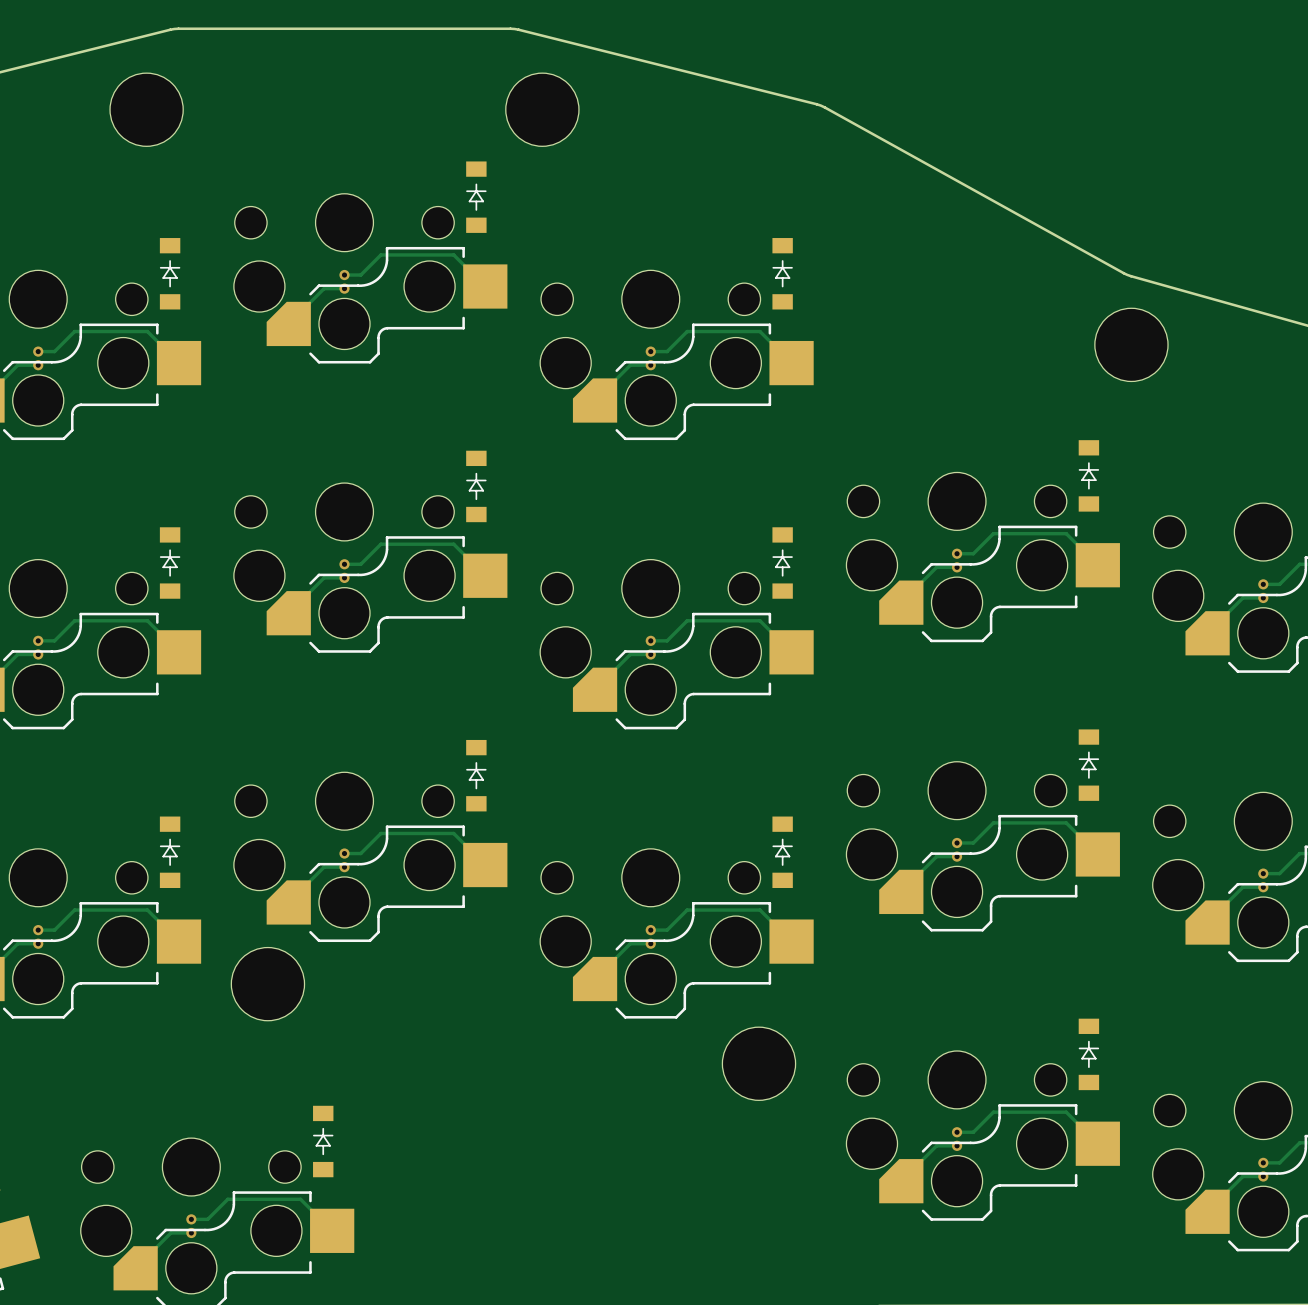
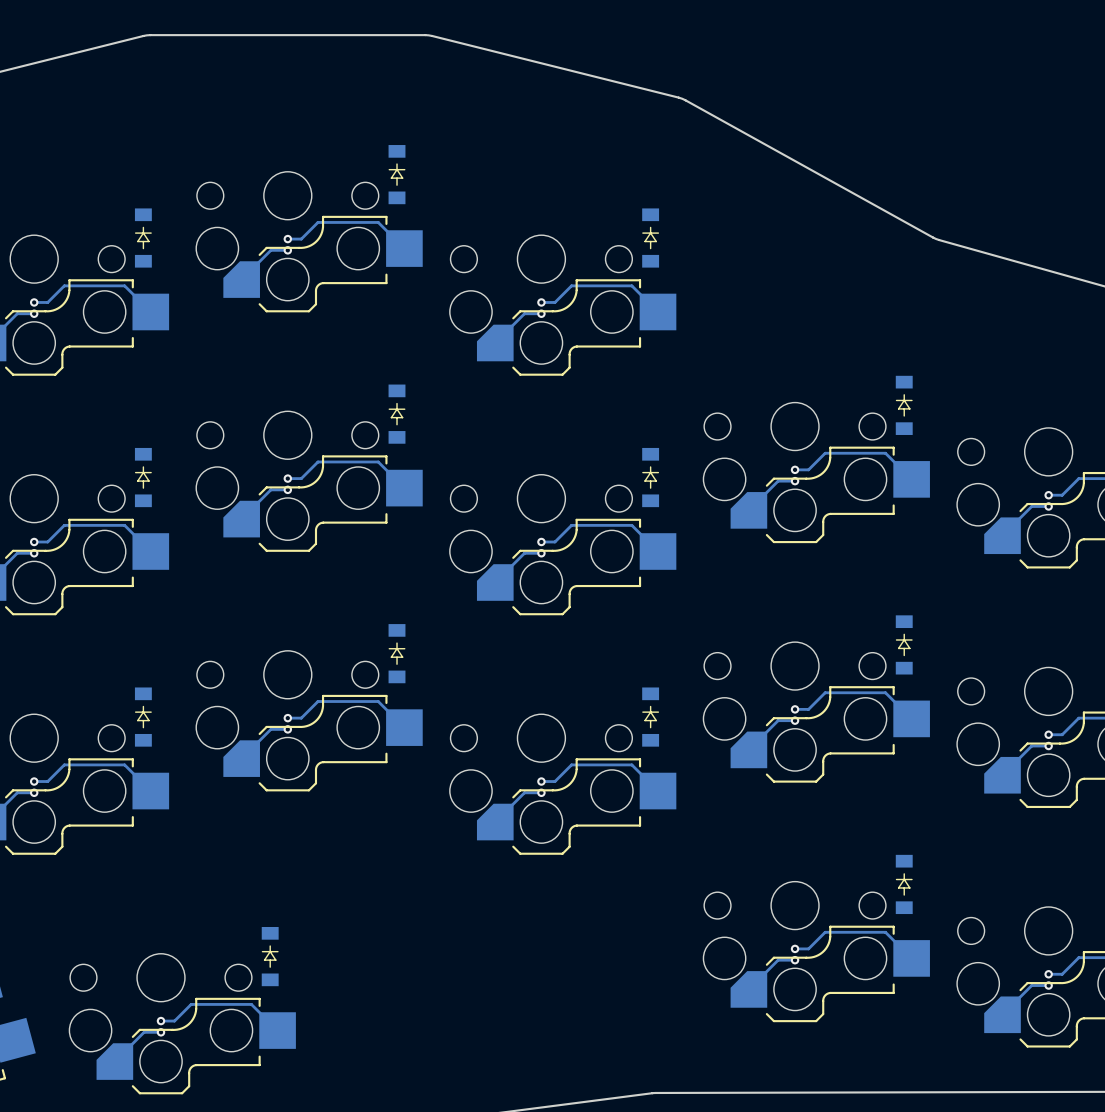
part: (146, 109) -> none
part: (542, 109) -> none
part: (1131, 344) -> none
part: (267, 984) -> none
part: (758, 1063) -> none

